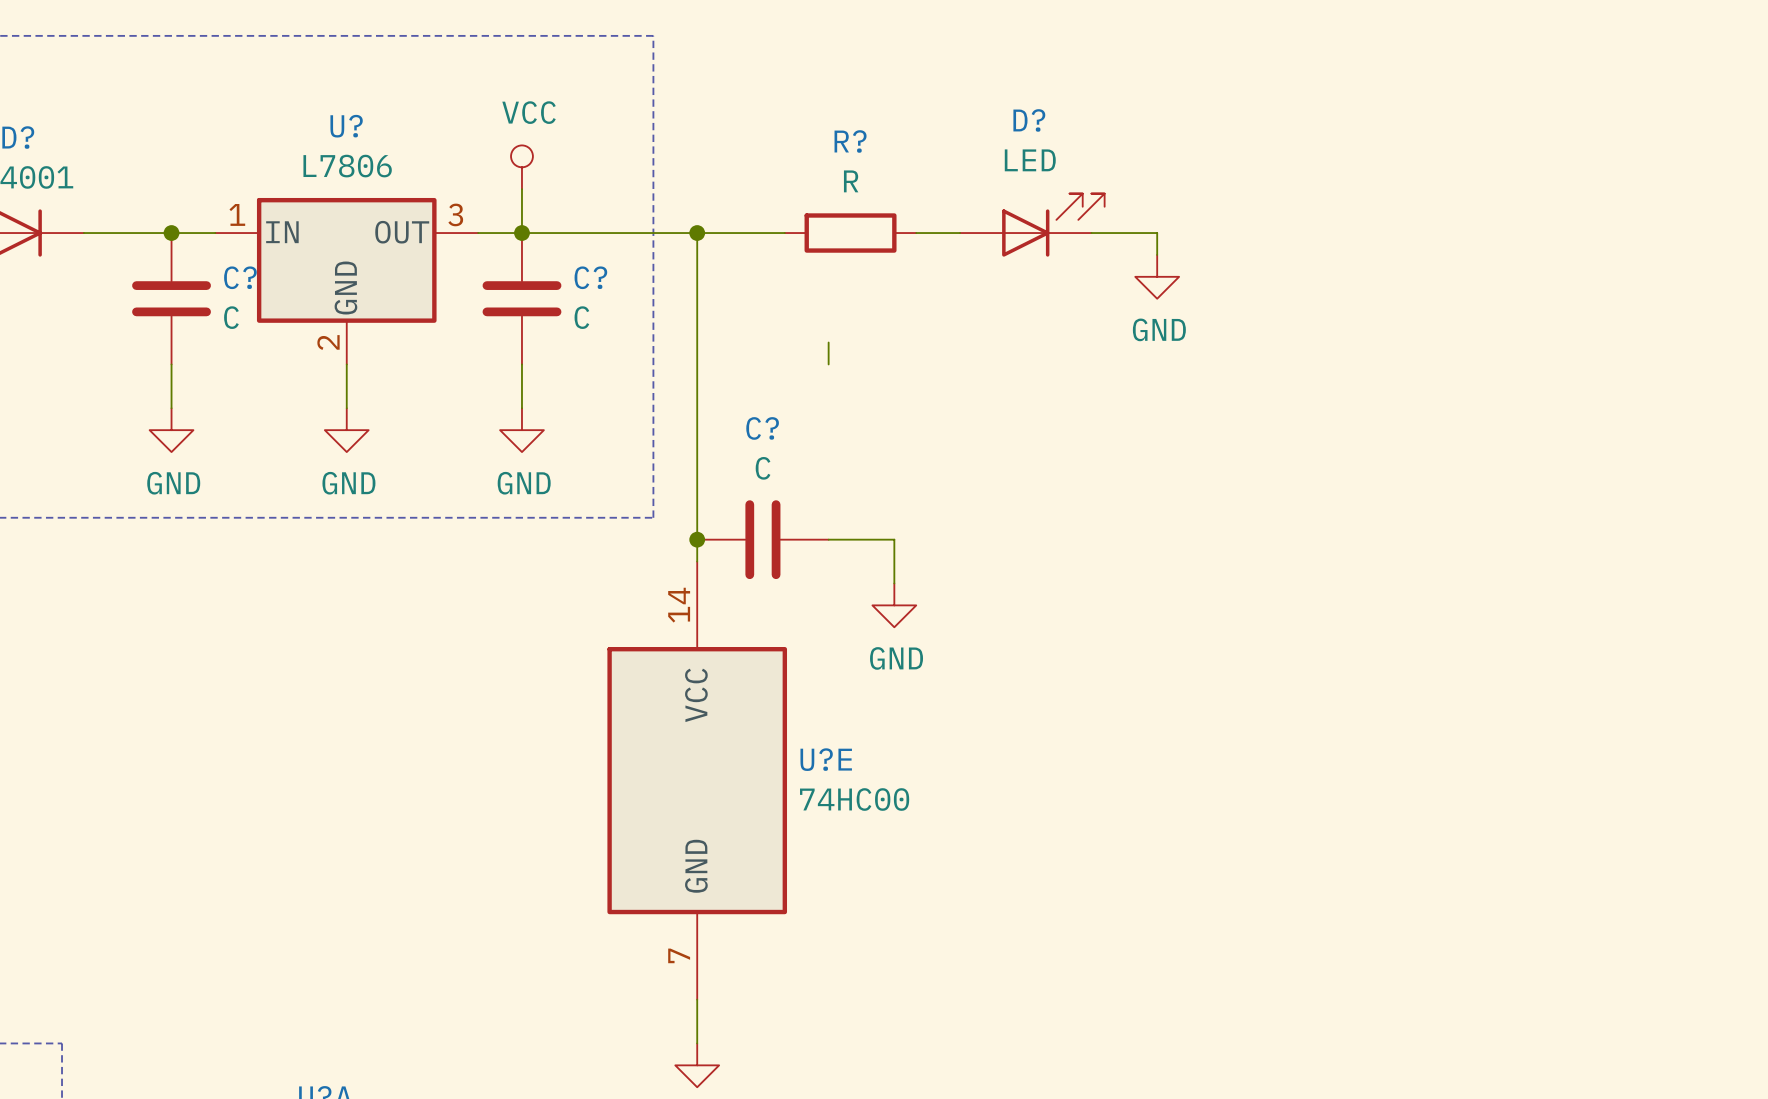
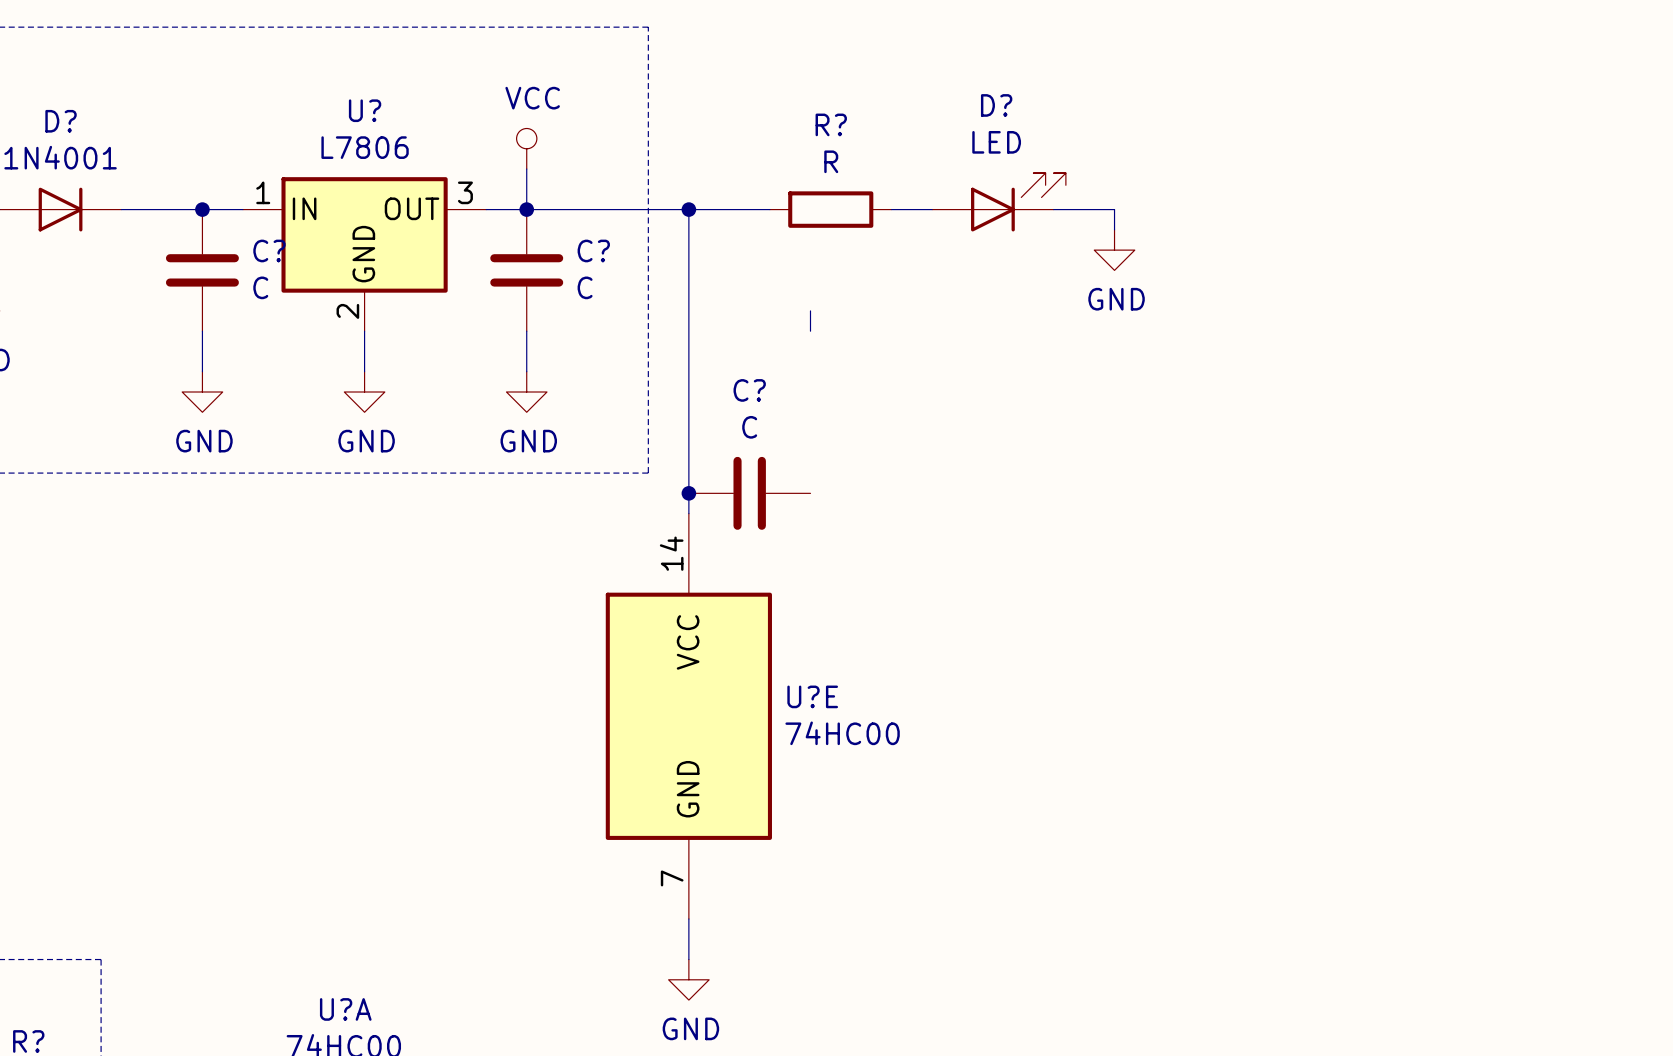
wire: (828, 539) (894, 539) (894, 583) -> none
power symbol: GND (894, 605) -> none

